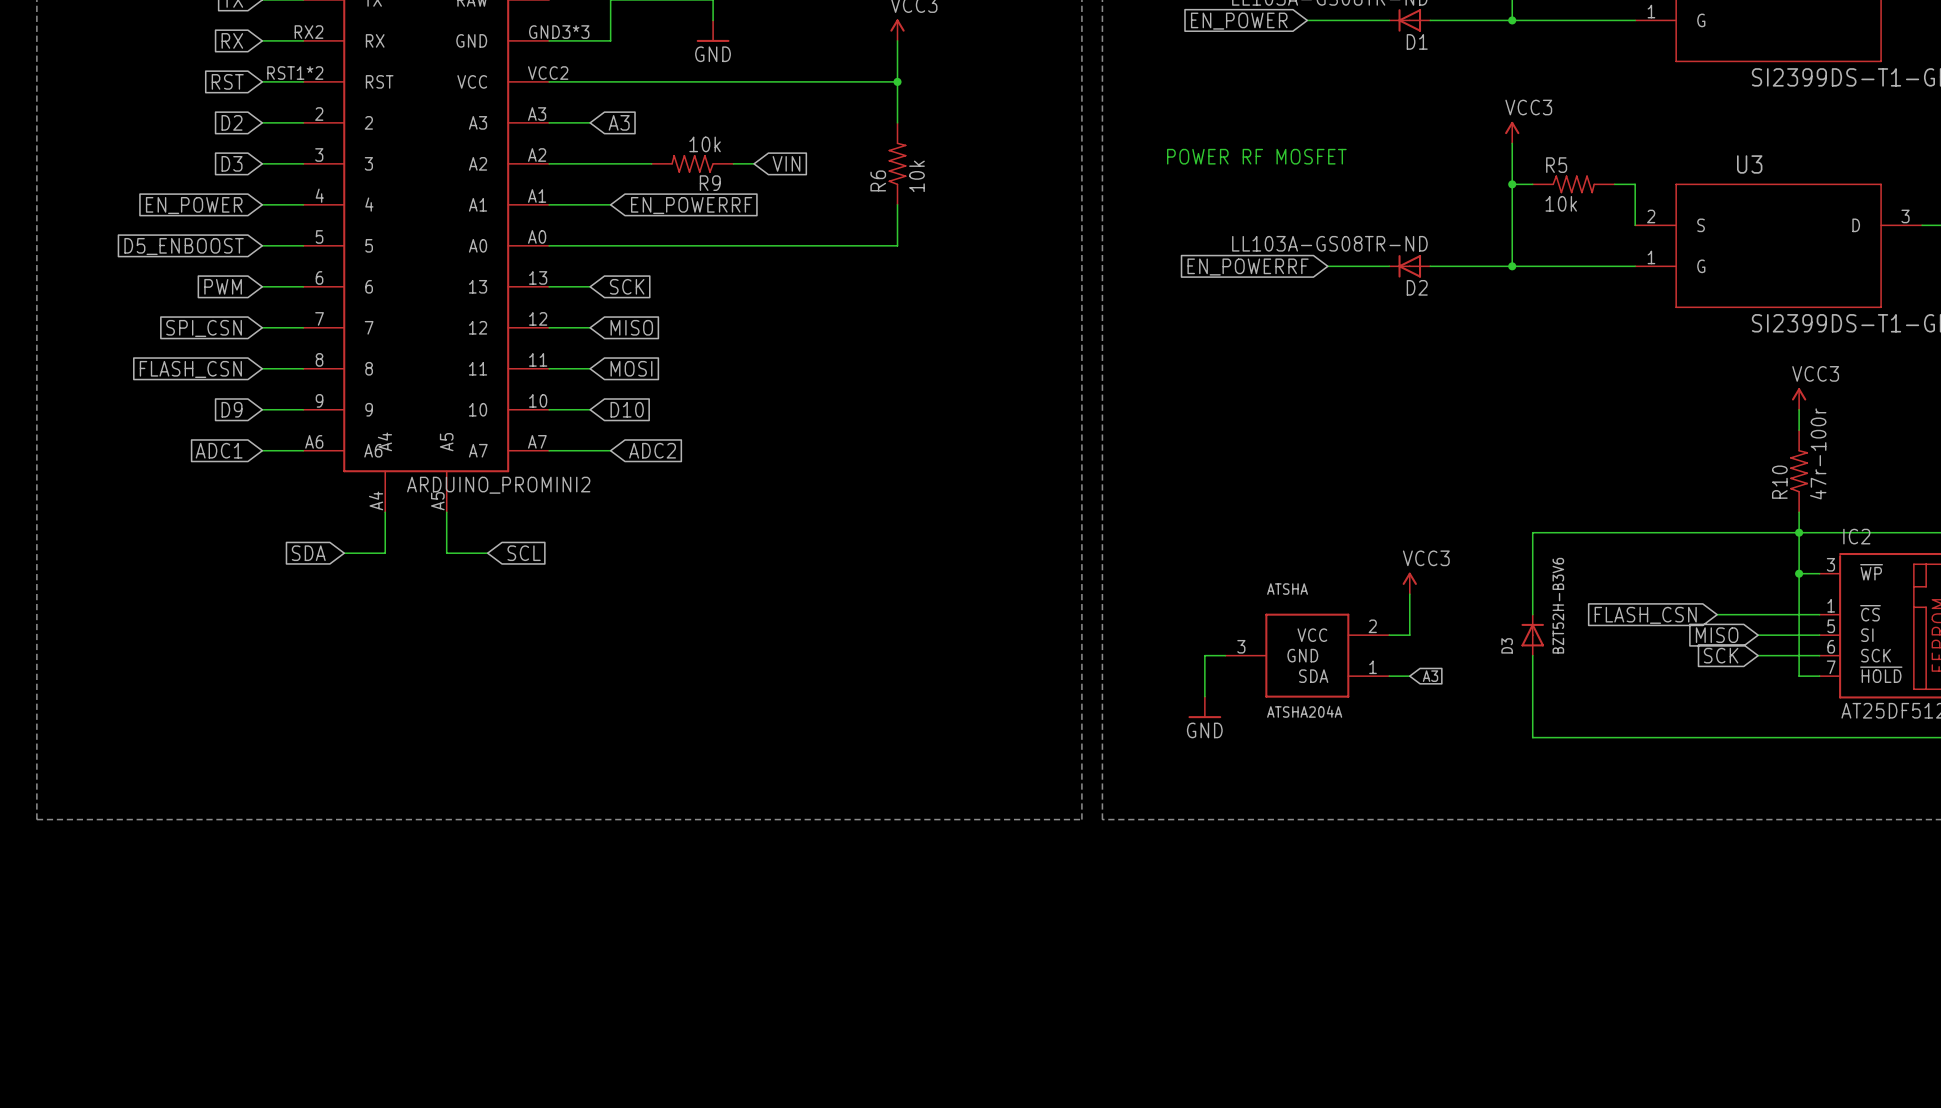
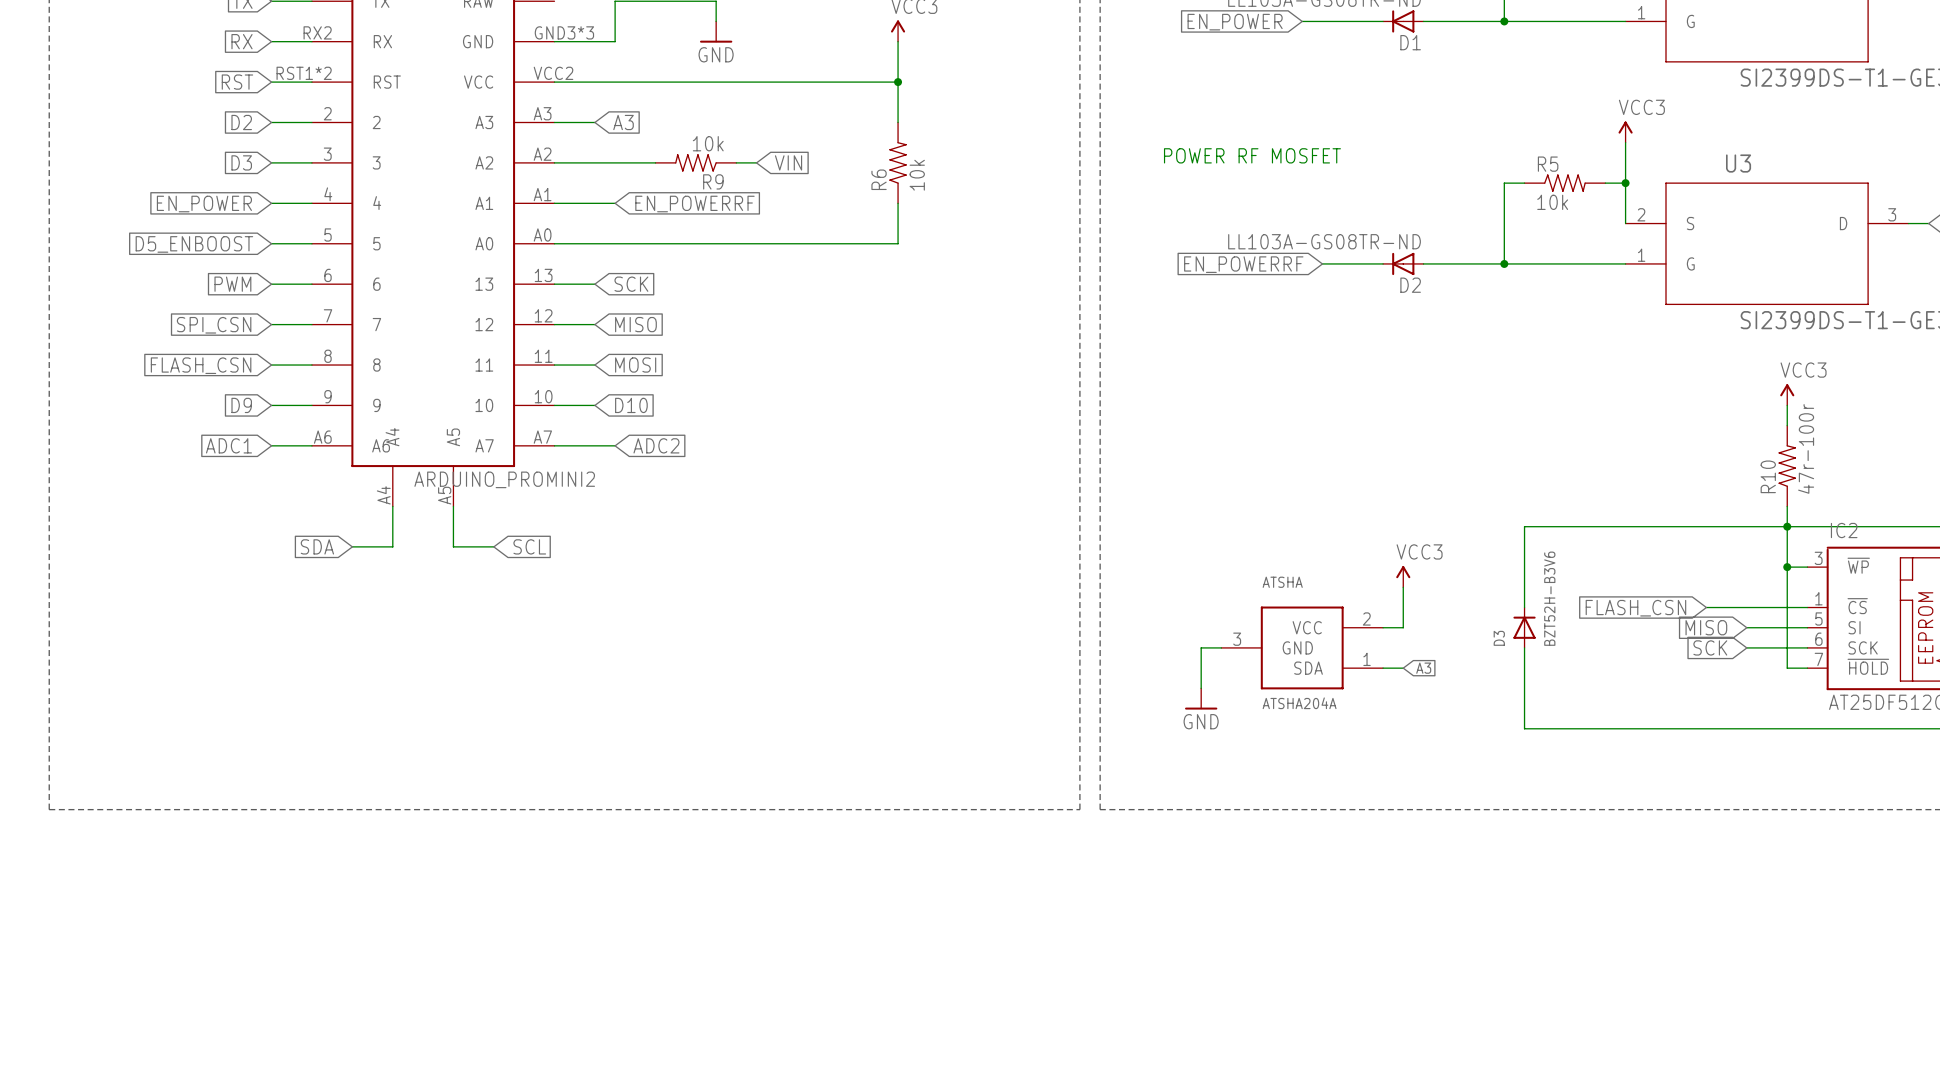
power symbol position: VCC3 (1512, 132) -> VCC3 (1625, 132)
wire: (1512, 143) (1512, 184) -> (1625, 142) (1625, 183)
junction: (1512, 184) -> none
junction: none -> (1625, 183)

